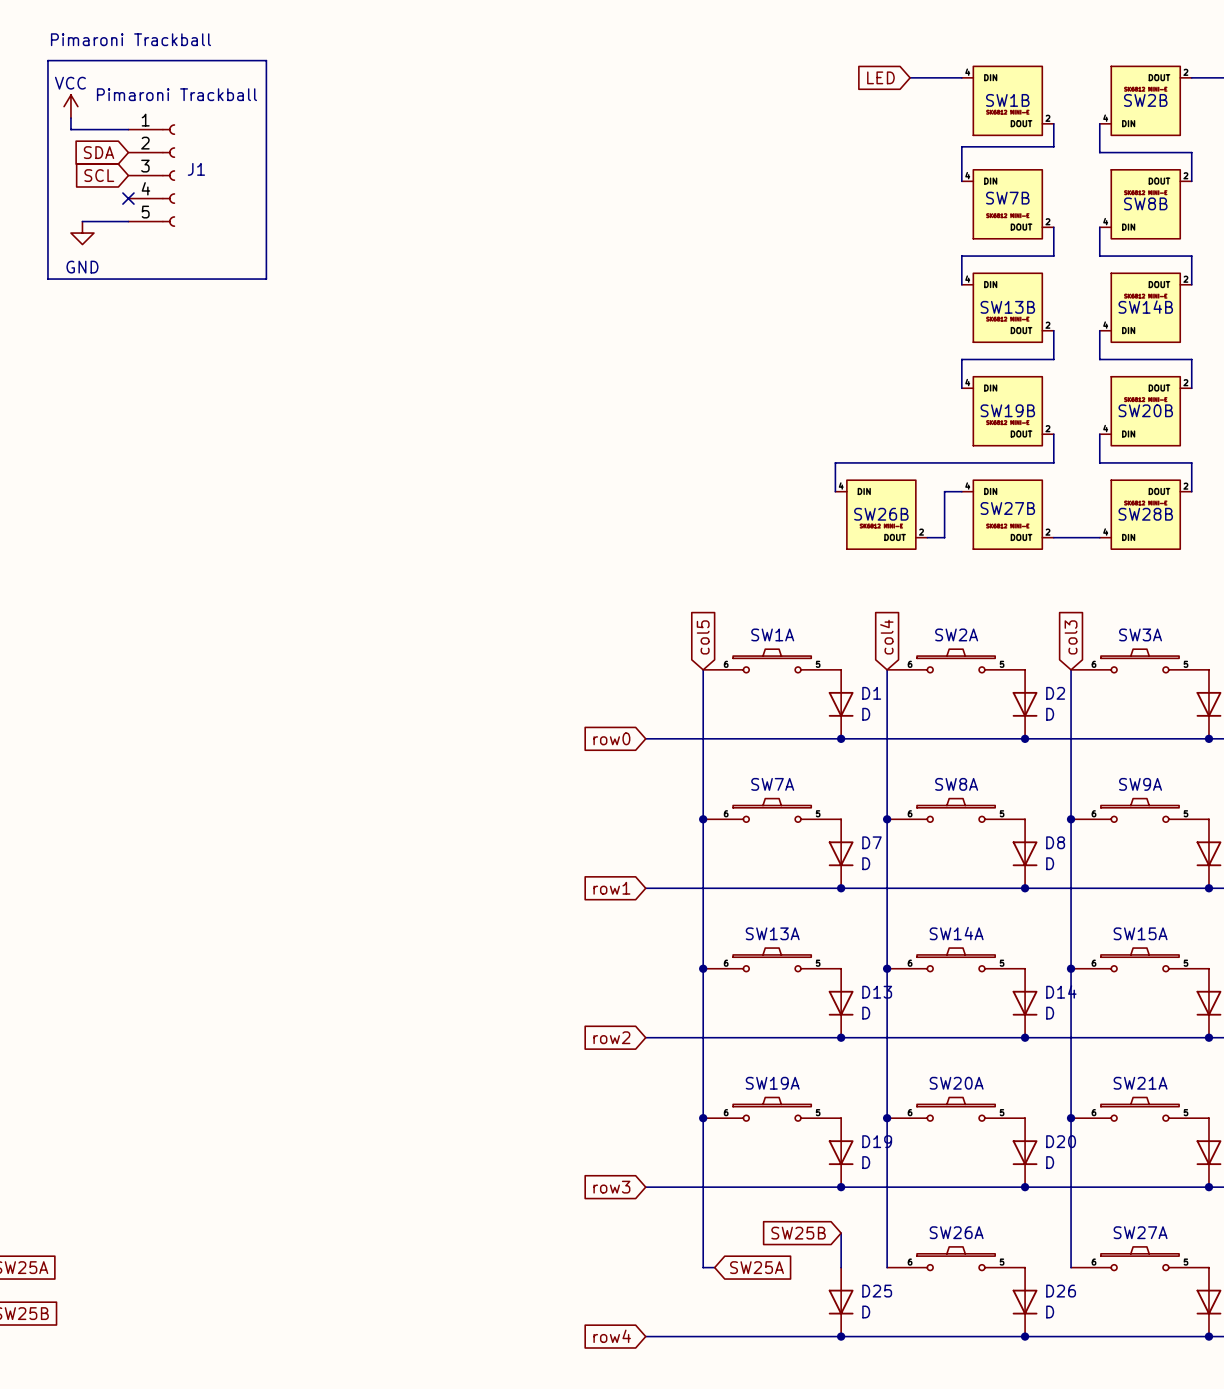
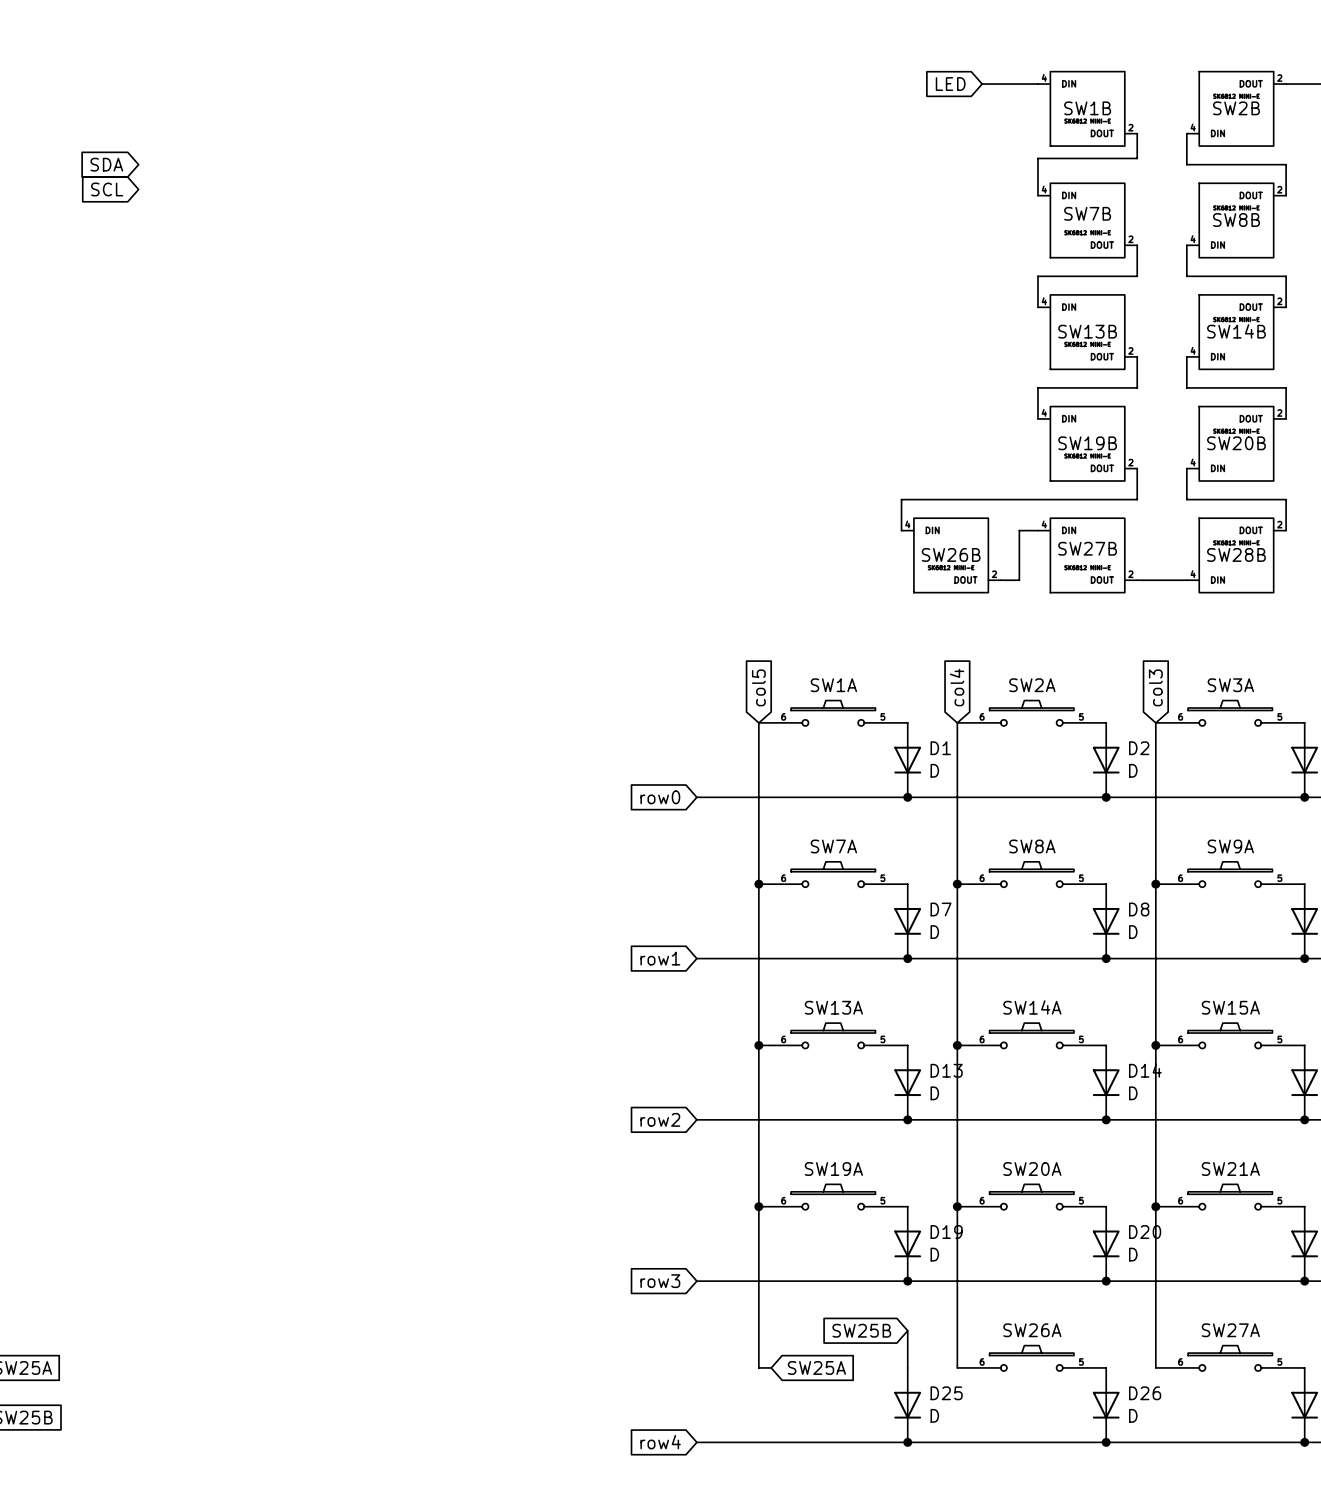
text: Pimaroni Trackball (130, 39) -> none
line: (47, 60) (266, 60) (266, 279) (47, 279) (47, 60) -> none
power symbol: VCC (70, 106) -> none
wire: (70, 118) (70, 129) (128, 129) -> none
J1: Pimaroni Trackball (151, 175) -> none
no-connect mark: (128, 198) -> none
wire: (82, 221) (128, 221) -> none
power symbol: GND (82, 233) -> none

